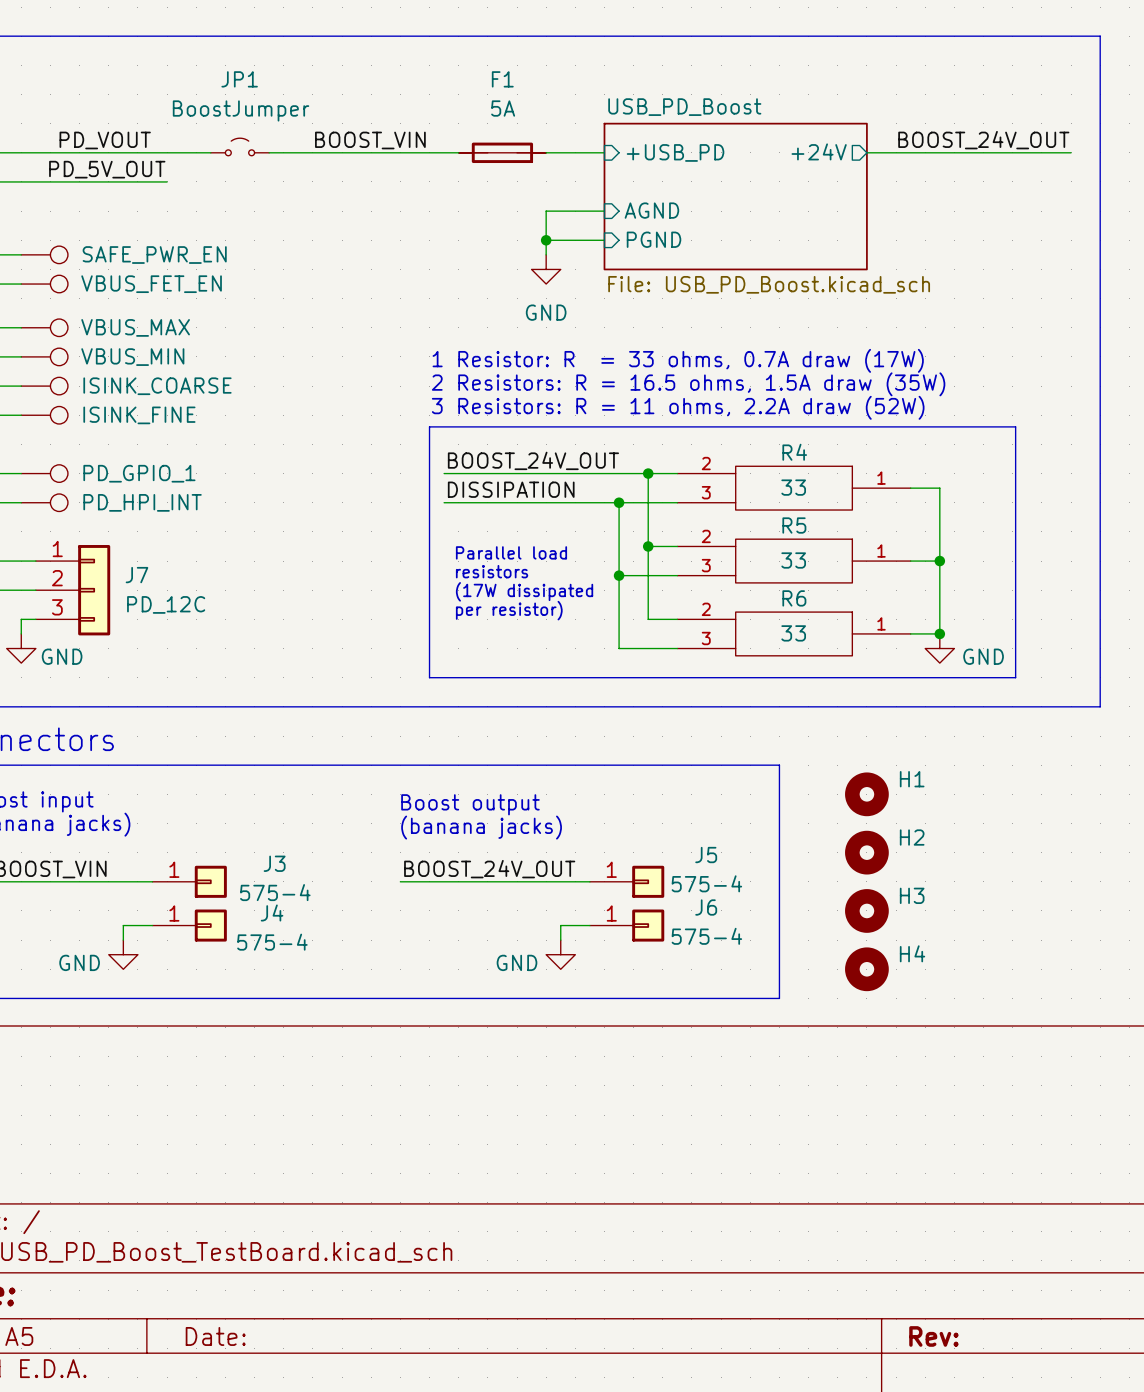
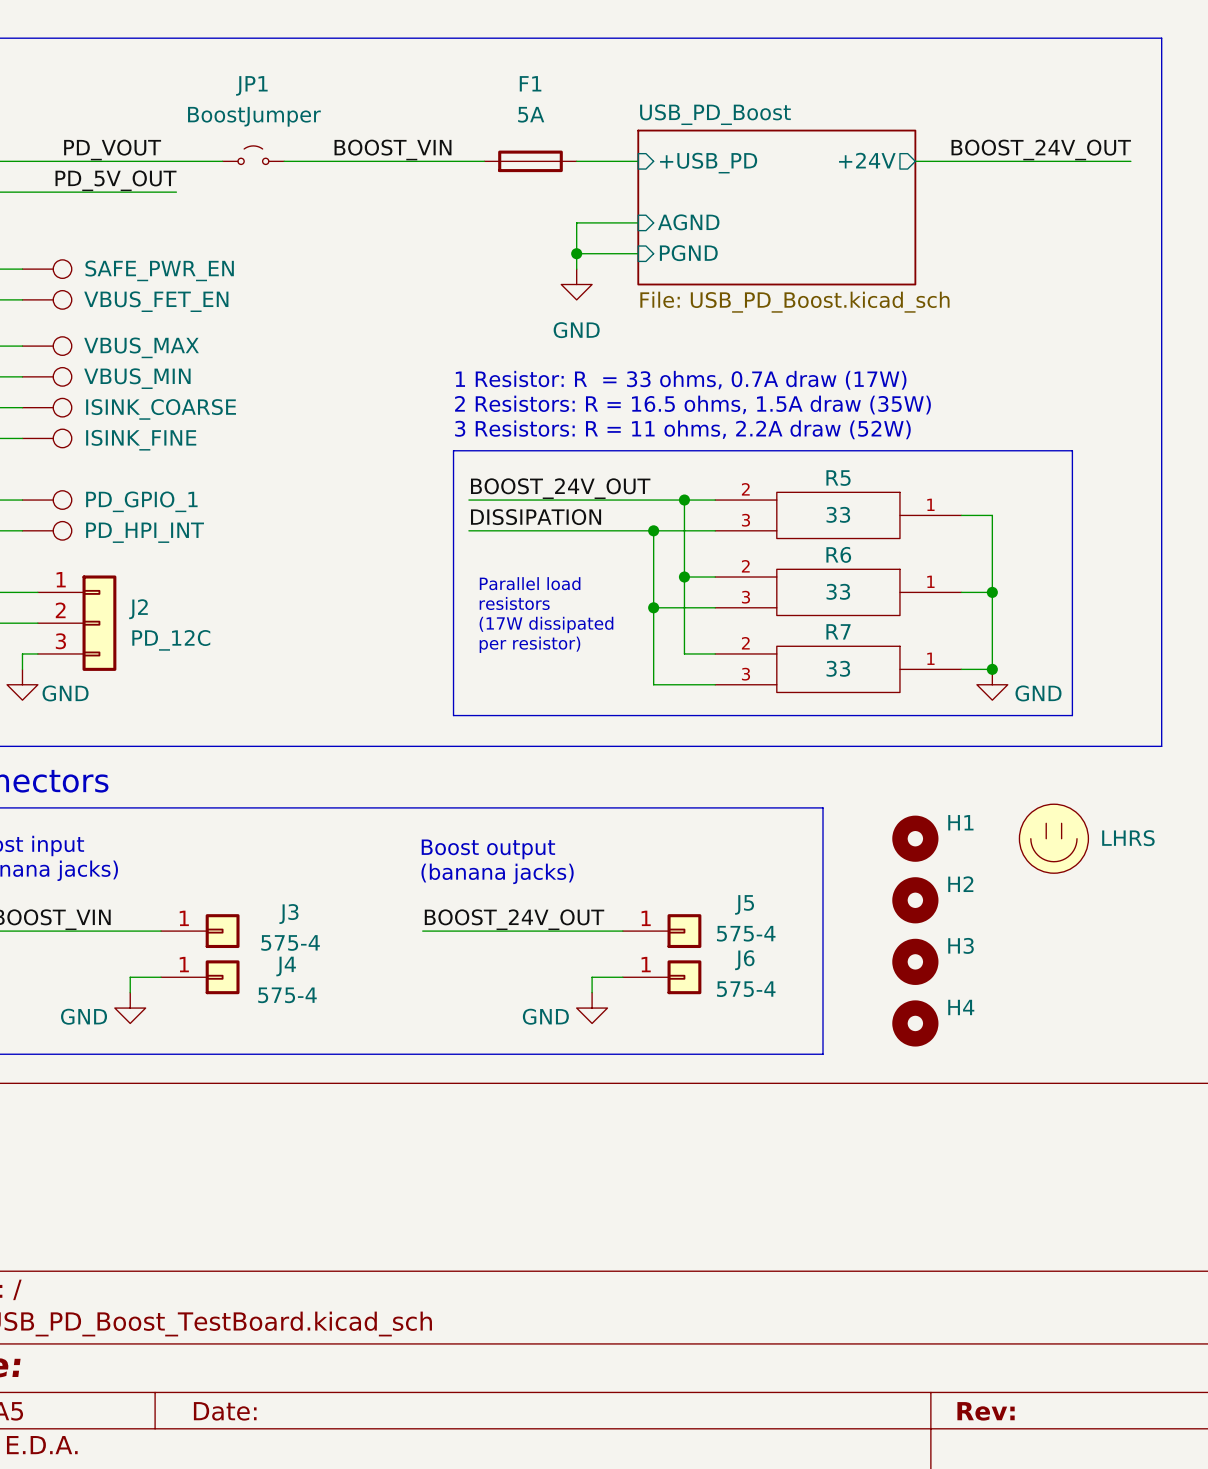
F1 symbol: [458, 142, 547, 164] -> [484, 150, 577, 173]
R4 name: R4 (794, 452) -> R5 (838, 478)
R5 name: R5 (794, 525) -> R6 (838, 554)
J7 name: J7 (136, 575) -> J2 (138, 609)
R6 name: R6 (794, 598) -> R7 (838, 631)
part: none -> LHRS (1053, 838)

